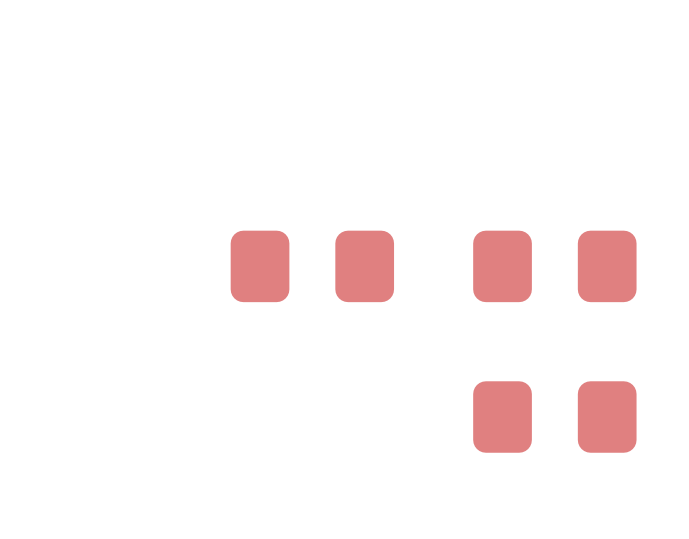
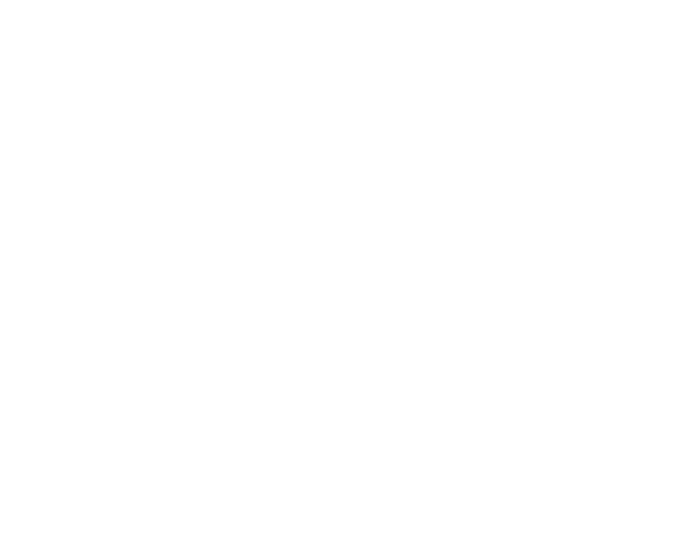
part: (312, 266) -> none
part: (554, 266) -> none
part: (554, 417) -> none

